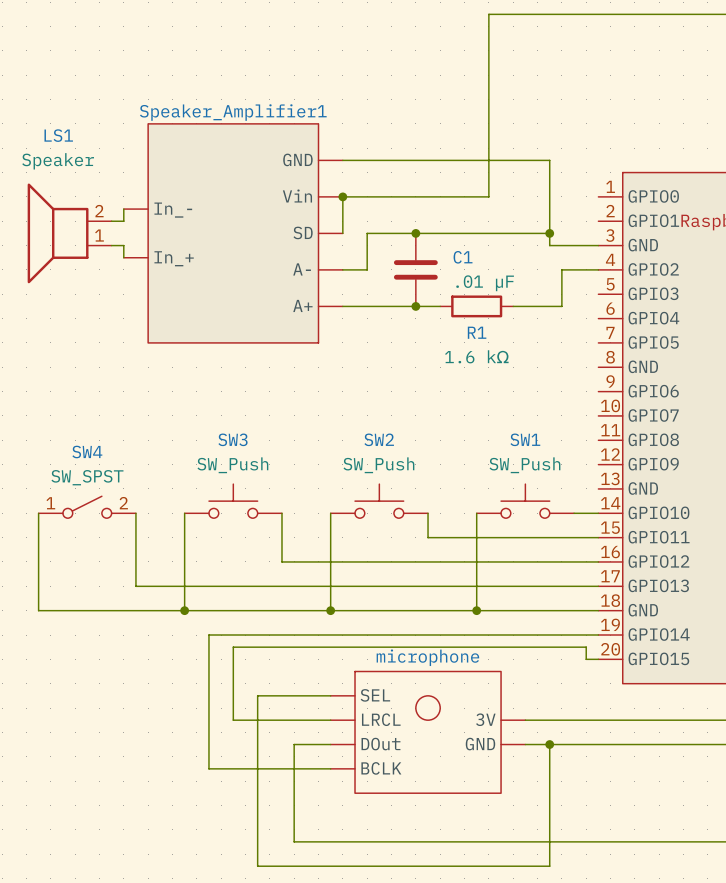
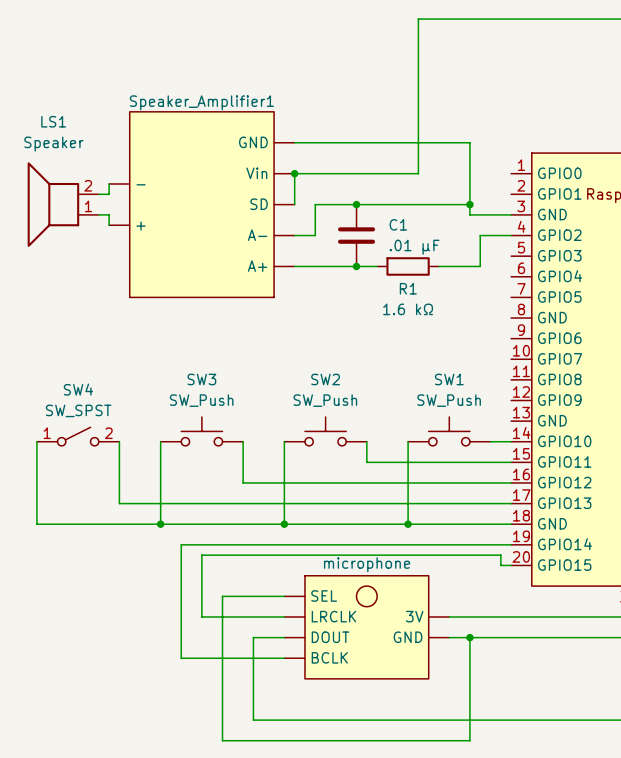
Speaker_Amplifier1 pin name: In_- (173, 210) -> - (141, 184)
Speaker_Amplifier1 pin name: In_+ (174, 258) -> + (141, 226)
microphone symbol: [330, 671, 526, 794] -> [284, 575, 450, 679]

